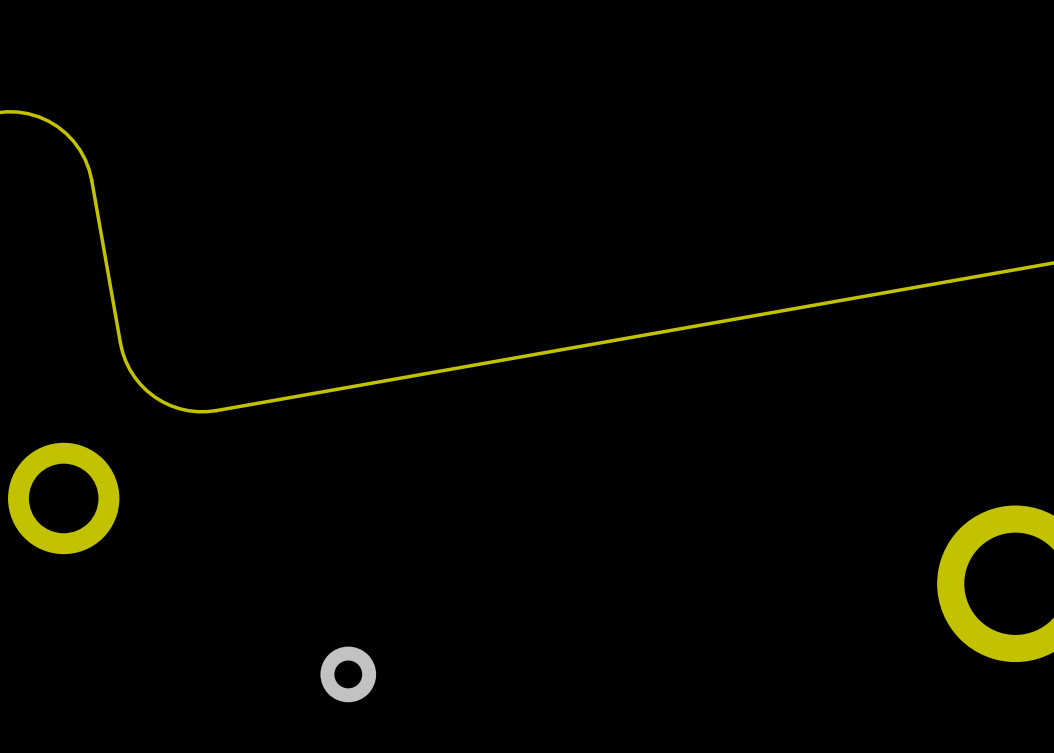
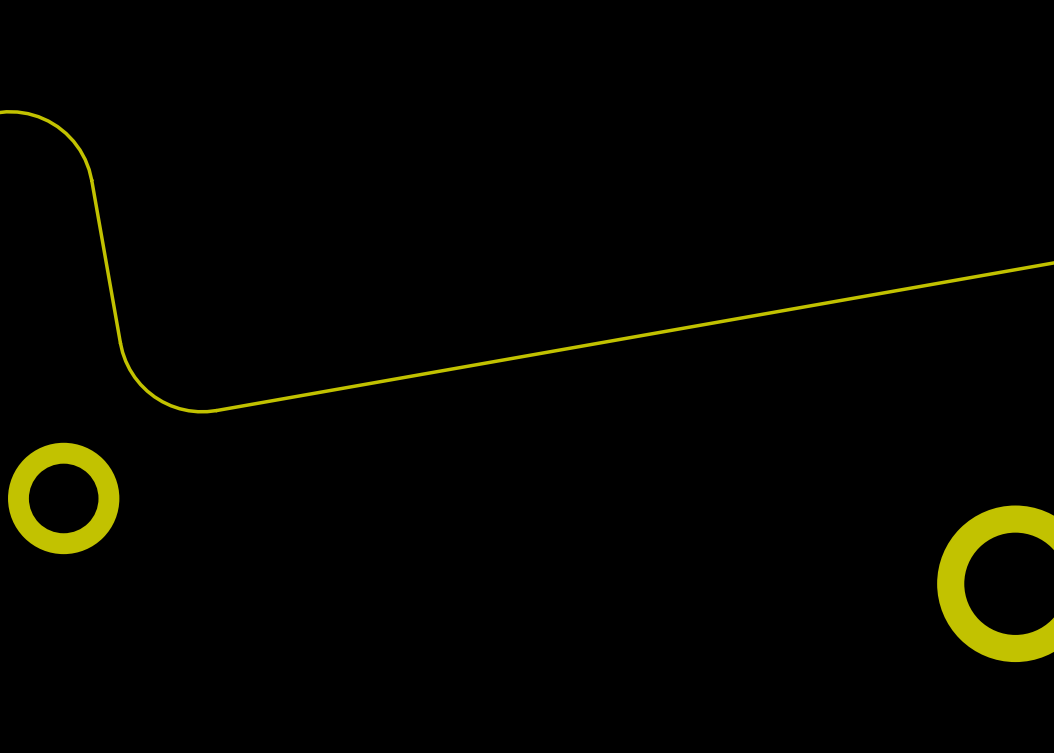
via: (348, 674) -> none

